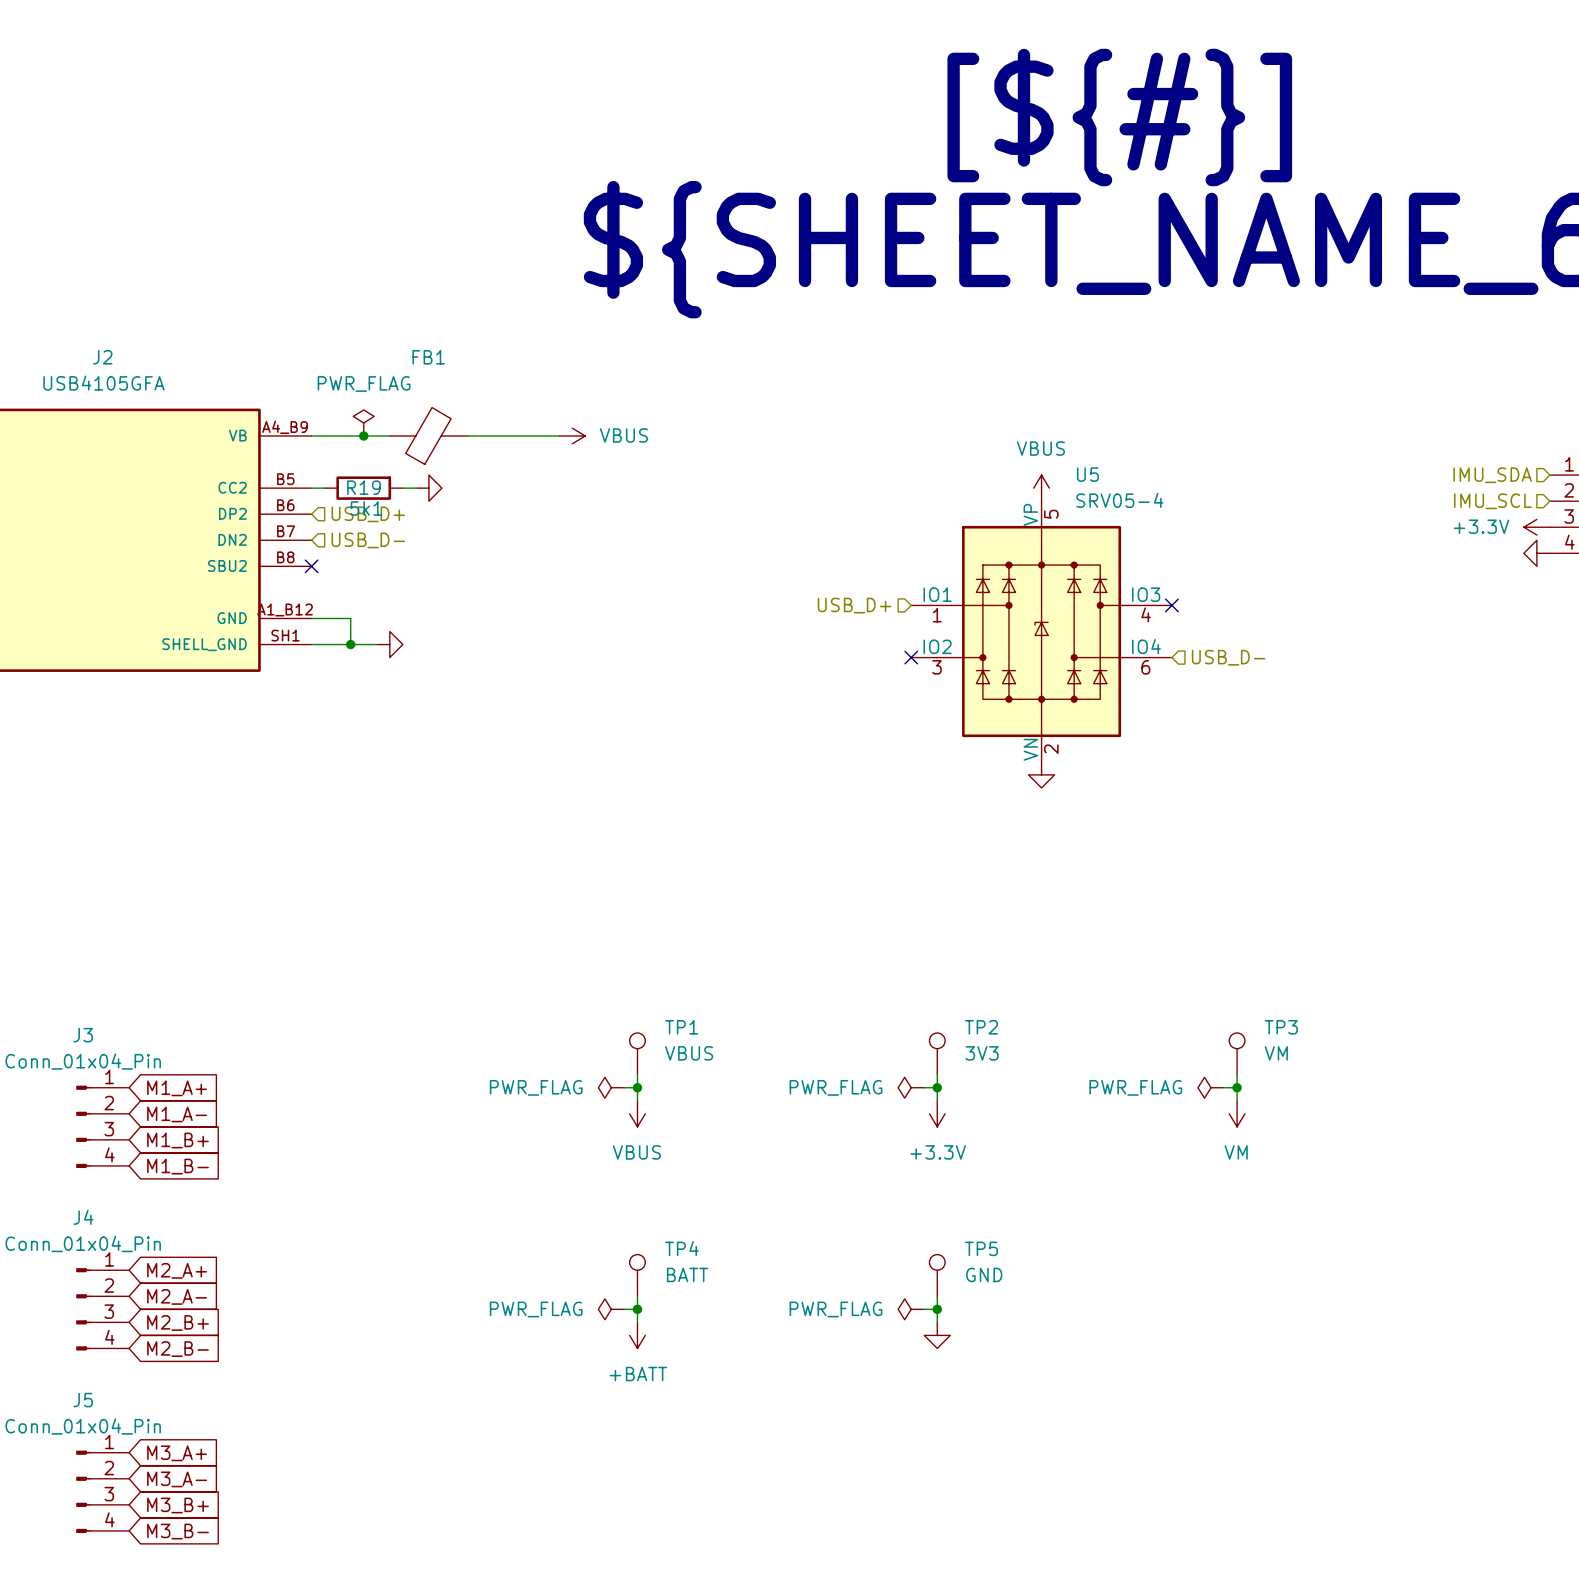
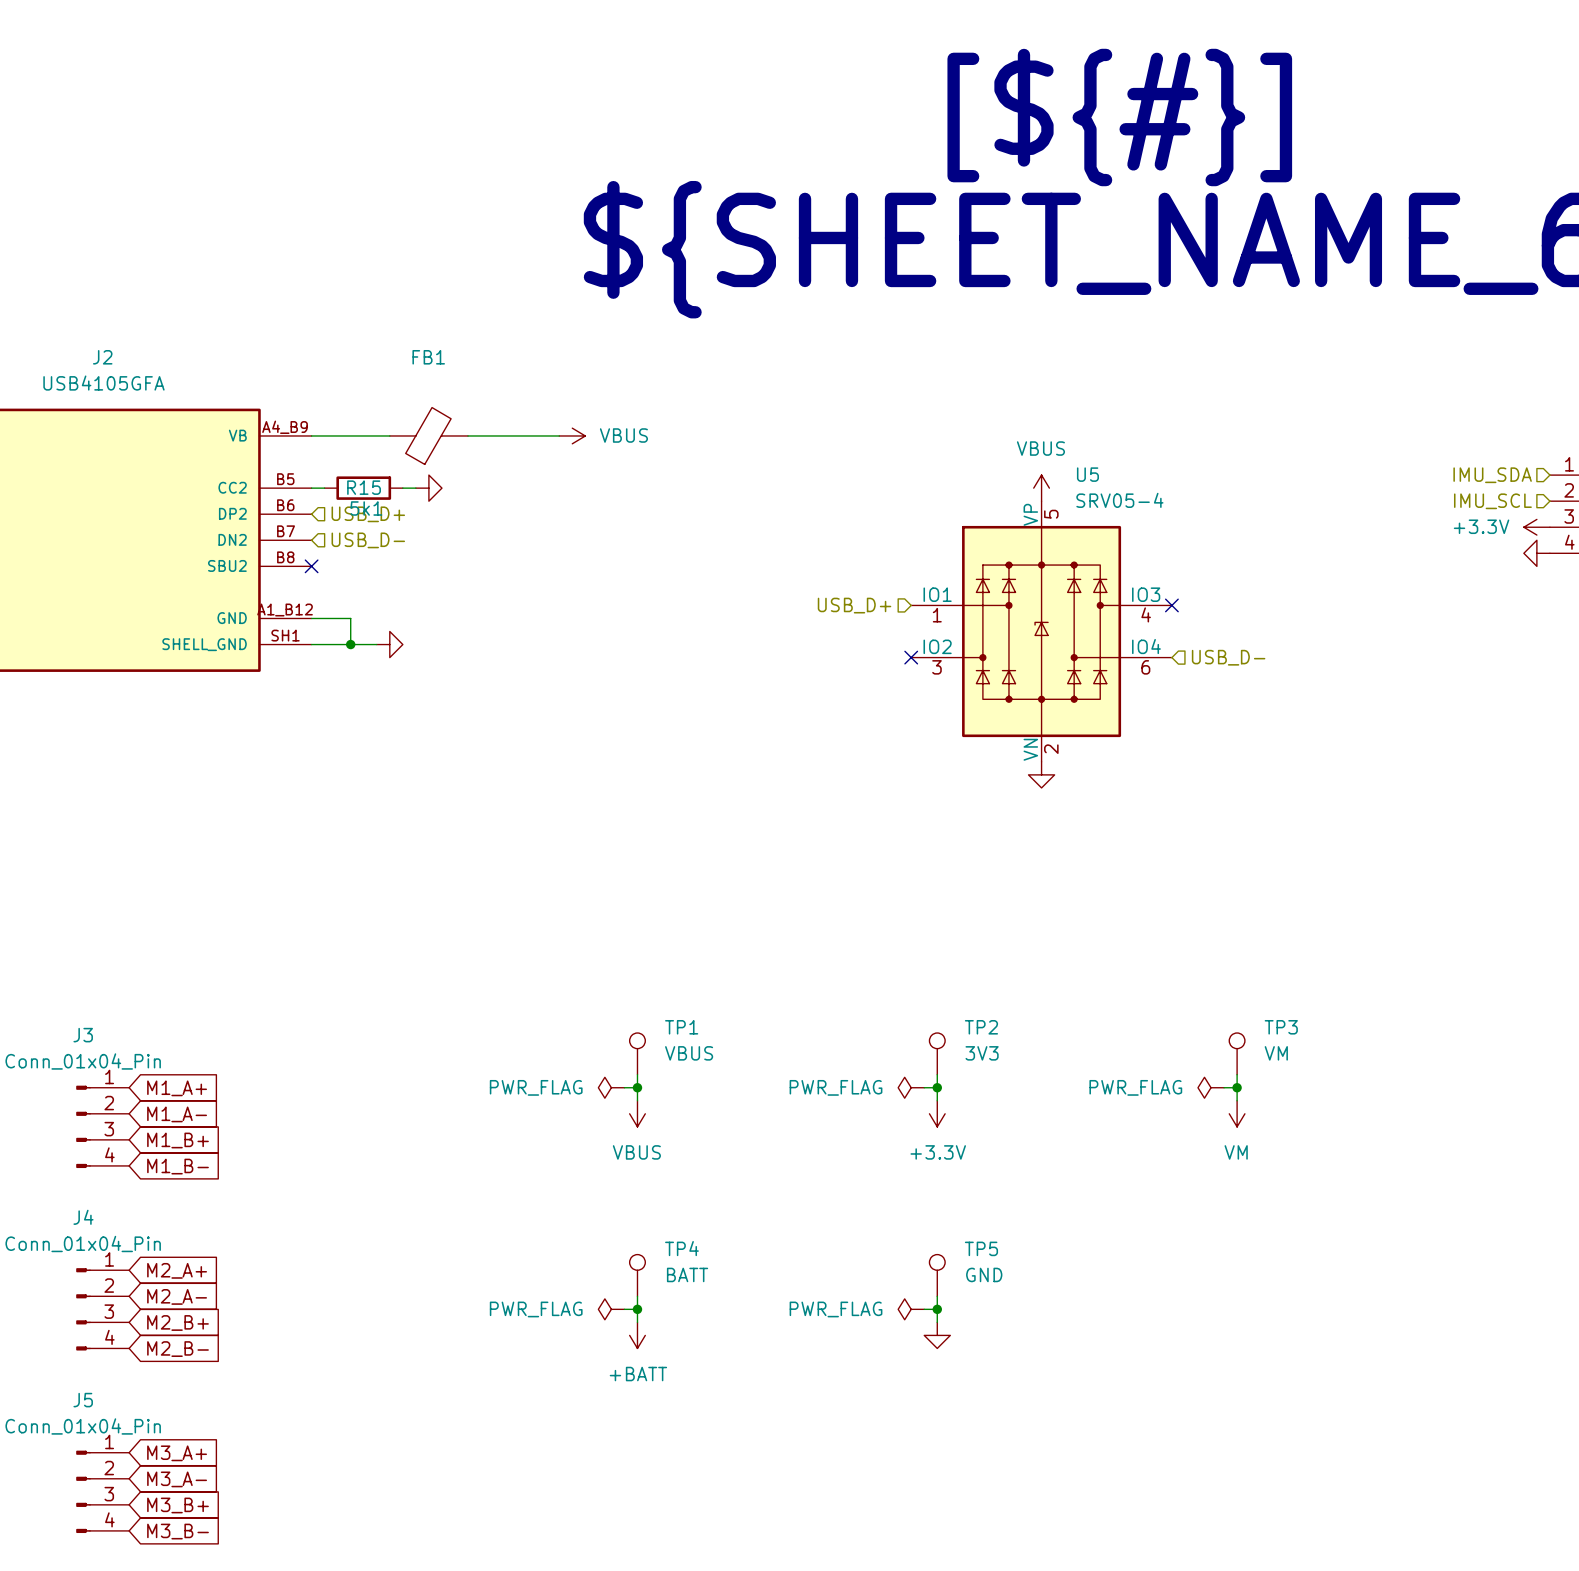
power symbol: PWR_FLAG (363, 422) -> none
junction: (363, 435) -> none
R19 name: R19 (364, 487) -> R15 (364, 487)

